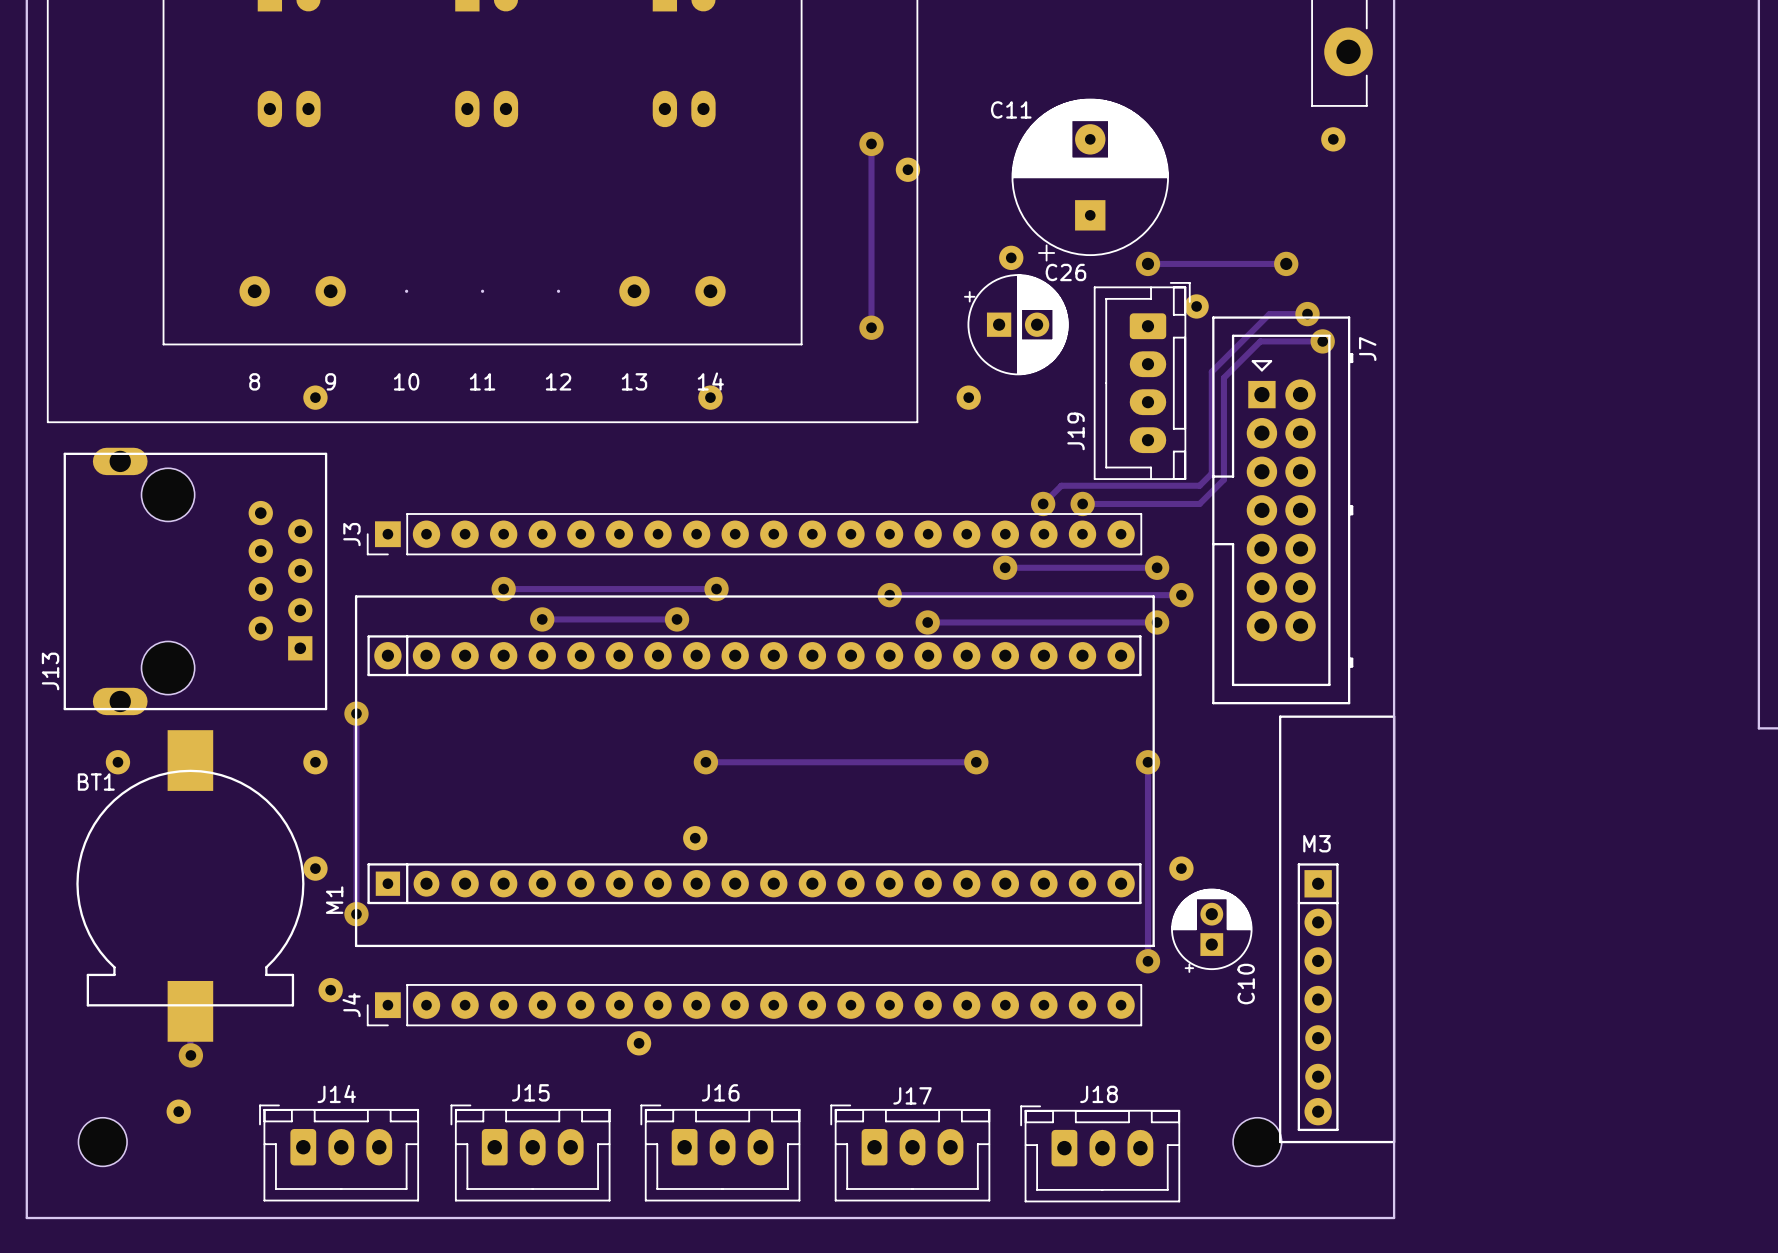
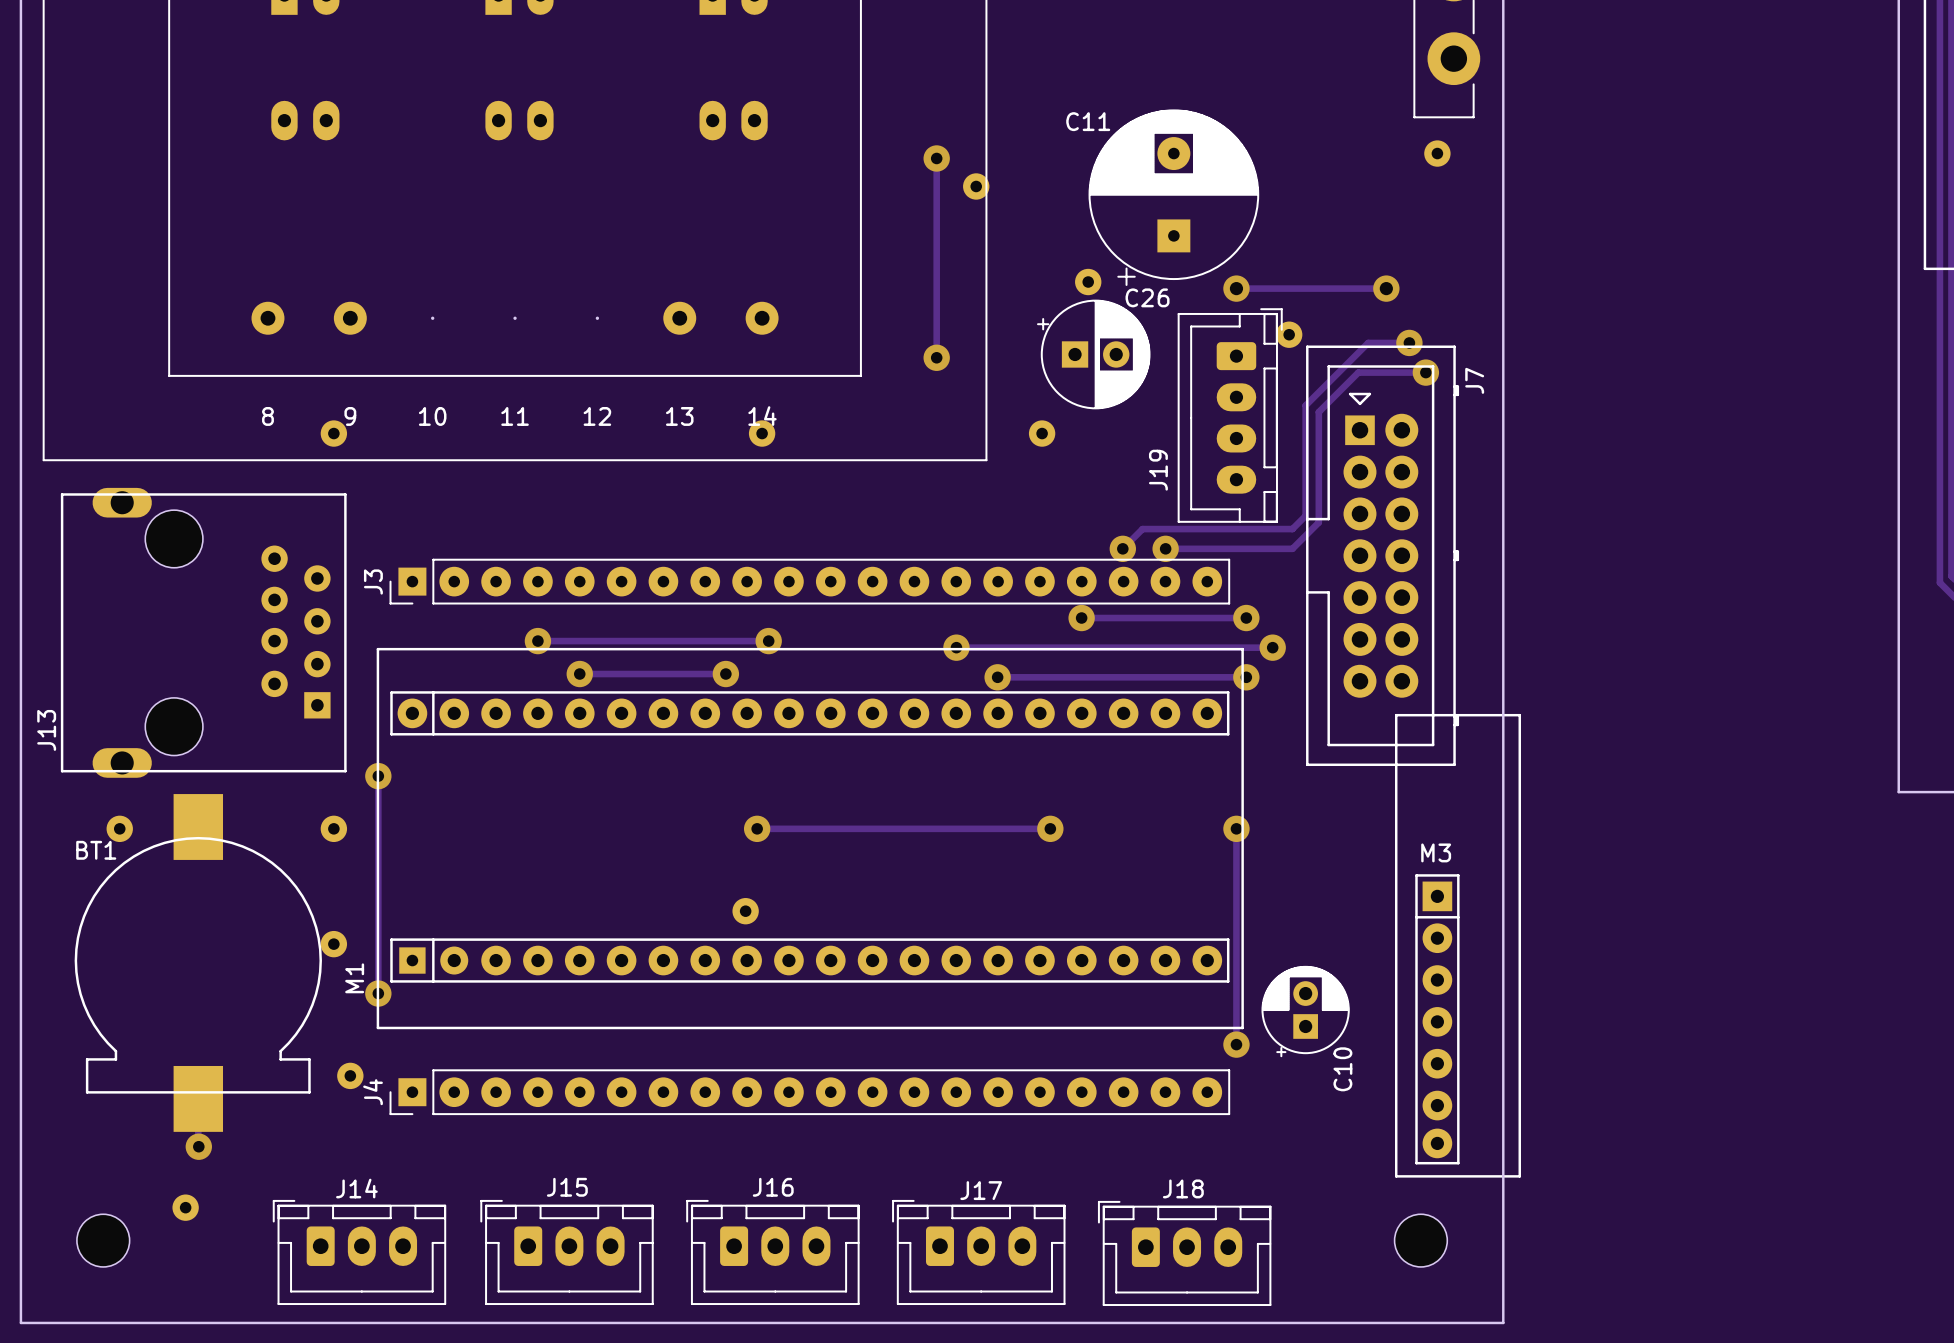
M3 footprint: [1279, 715, 1396, 1144] -> [1394, 713, 1521, 1178]
part: (1181, 868) -> none
part: (639, 1043) -> none
part position: (1257, 1142) -> (1420, 1240)

